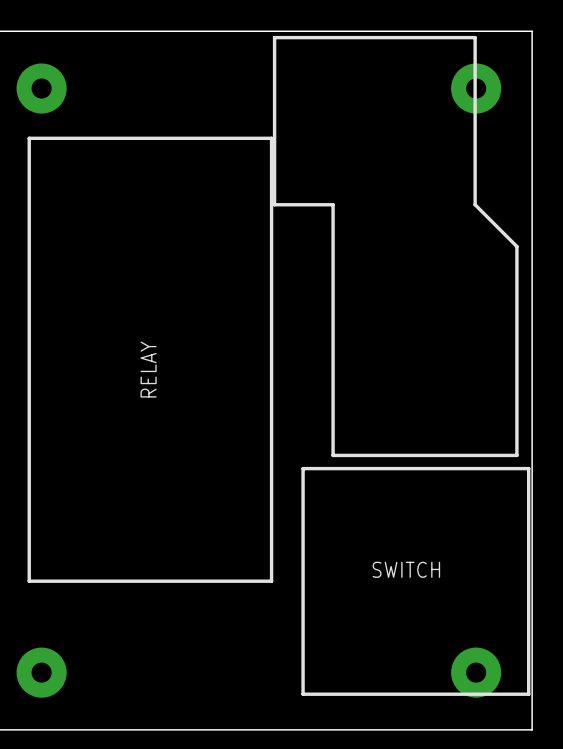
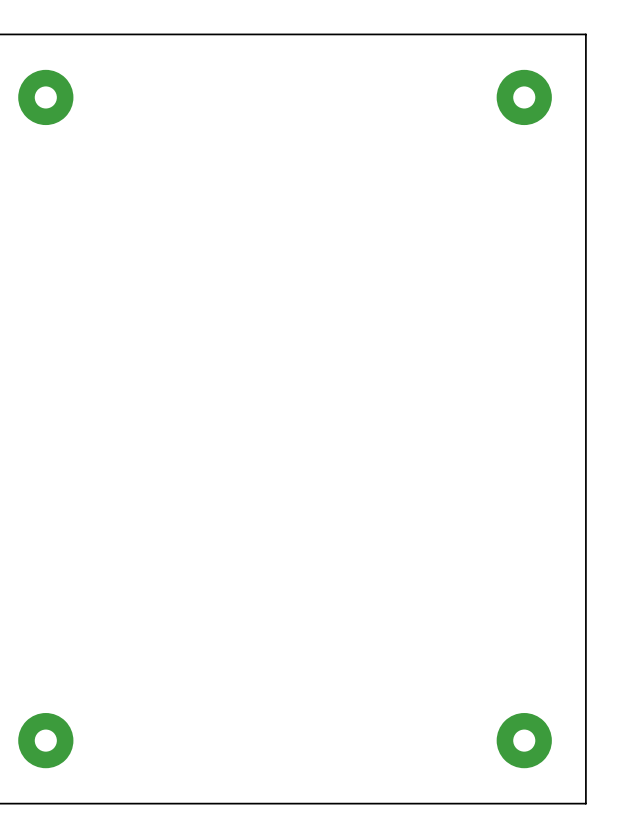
line: (274, 37) (475, 37) (475, 204) (516, 246) (516, 455) (333, 455) (333, 204) (274, 204) (274, 37) -> none
line: (29, 138) (29, 581) (271, 581) (271, 138) (29, 138) -> none
text: RELAY (148, 369) -> none
line: (303, 468) (528, 468) (528, 694) (303, 694) (303, 468) -> none
text: SWITCH (406, 569) -> none

